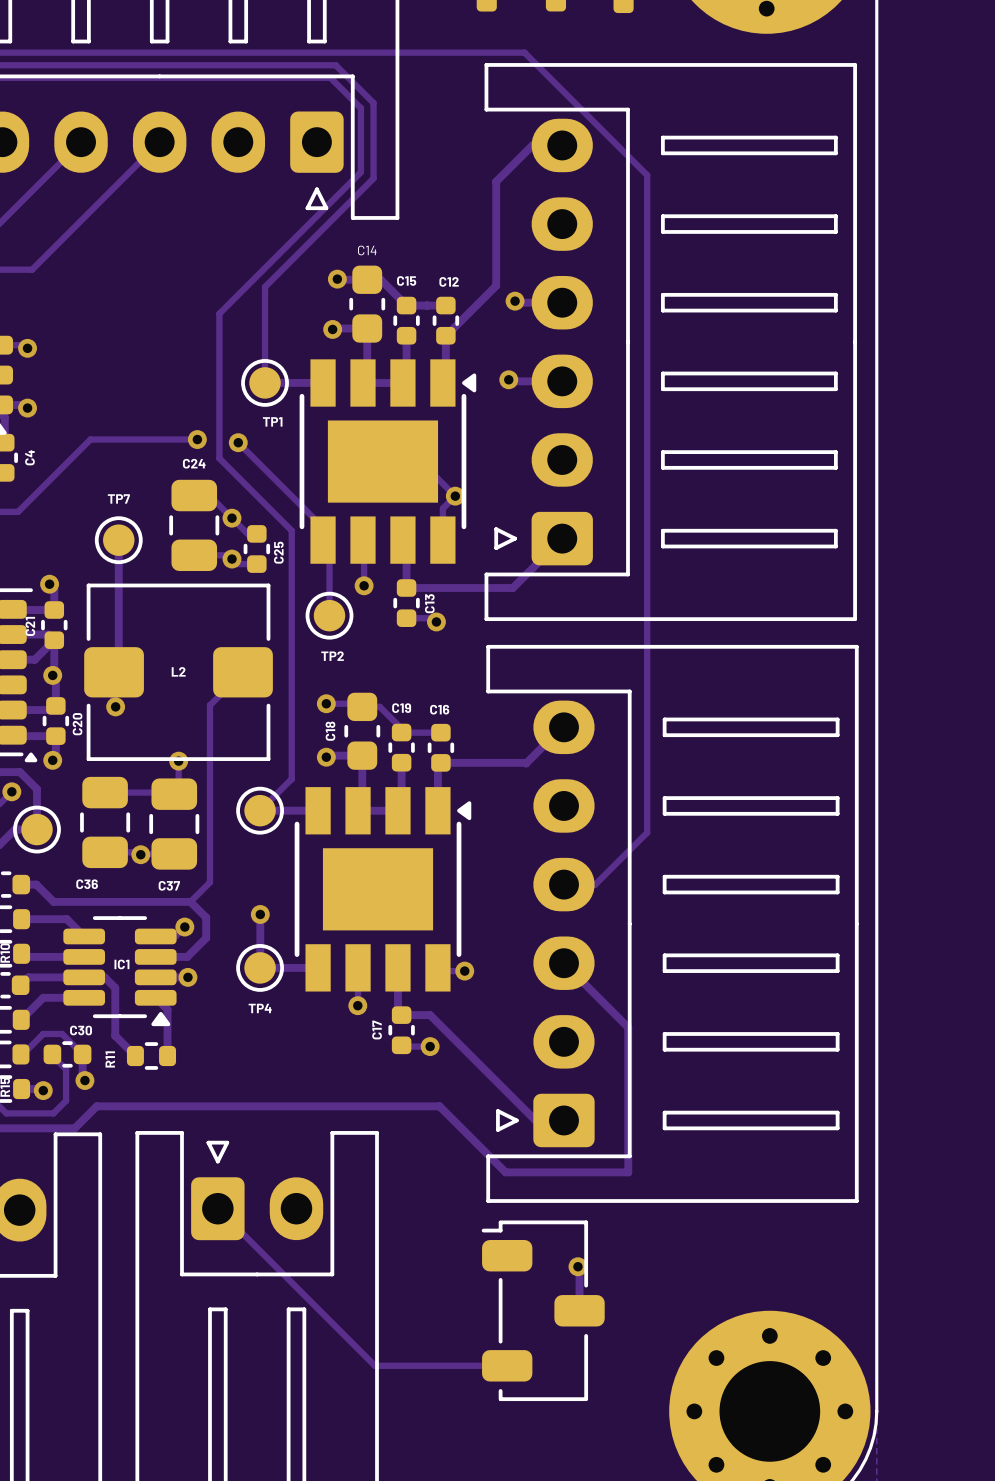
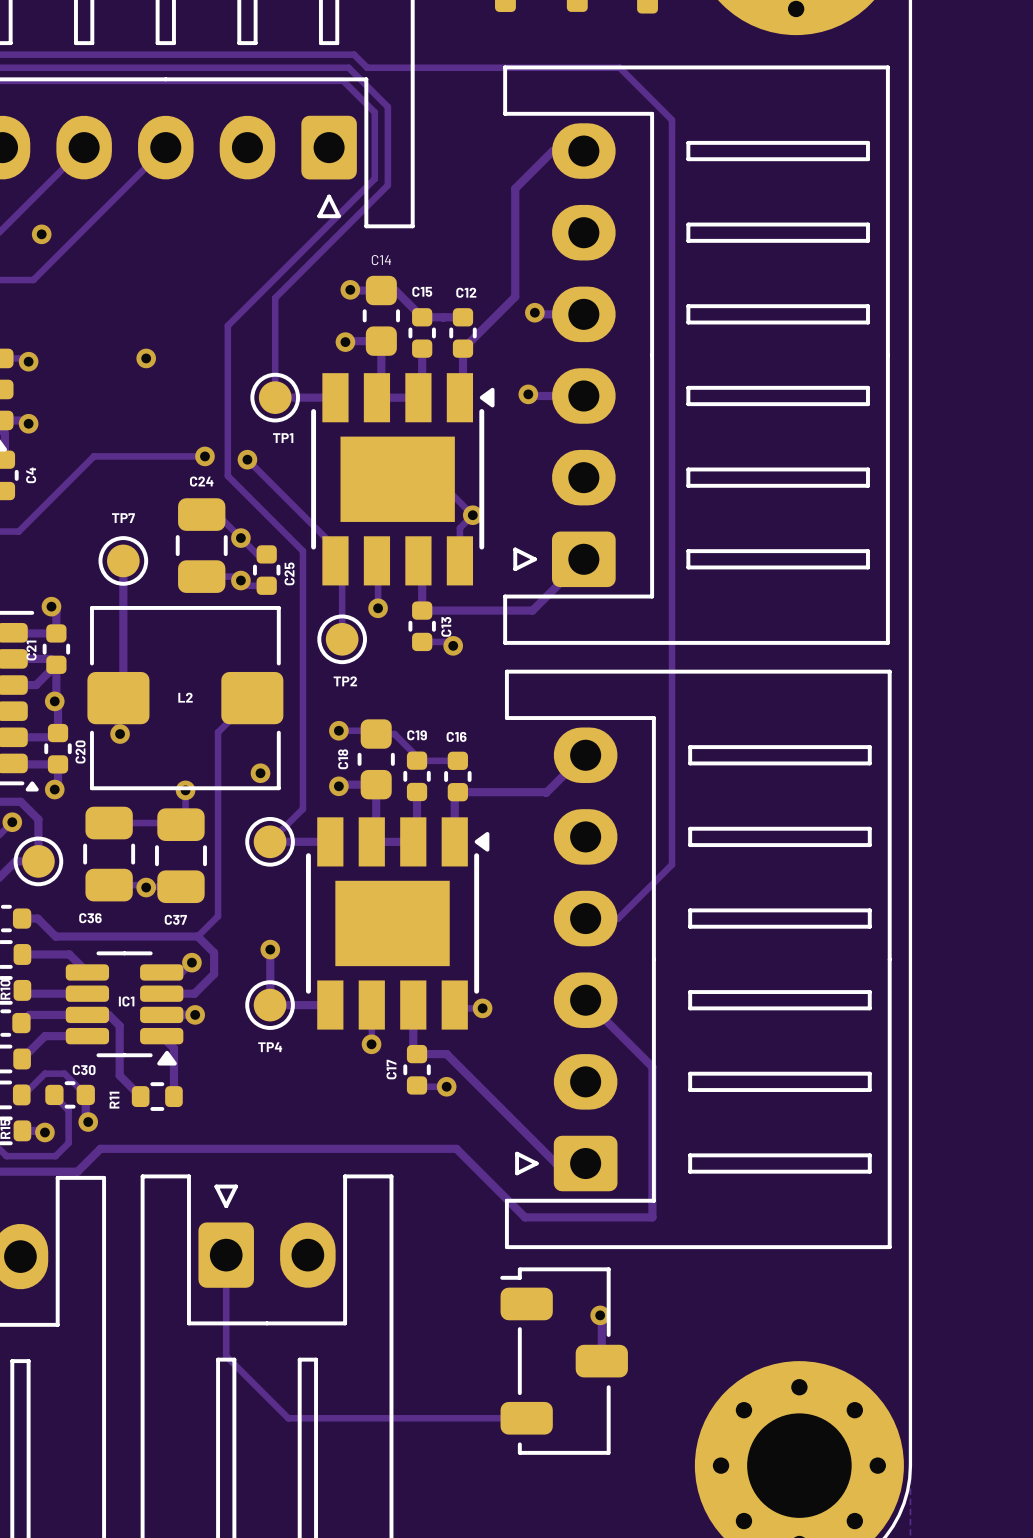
track: (341, 52) (524, 52) (647, 175) -> (354, 54) (367, 67) (619, 67) (672, 120) (672, 181)
via: none -> (41, 234)
via: none -> (146, 358)
via: none -> (260, 773)
track: (217, 1208) (374, 1365) -> (226, 1255) (226, 1356) (288, 1418) (389, 1418)

